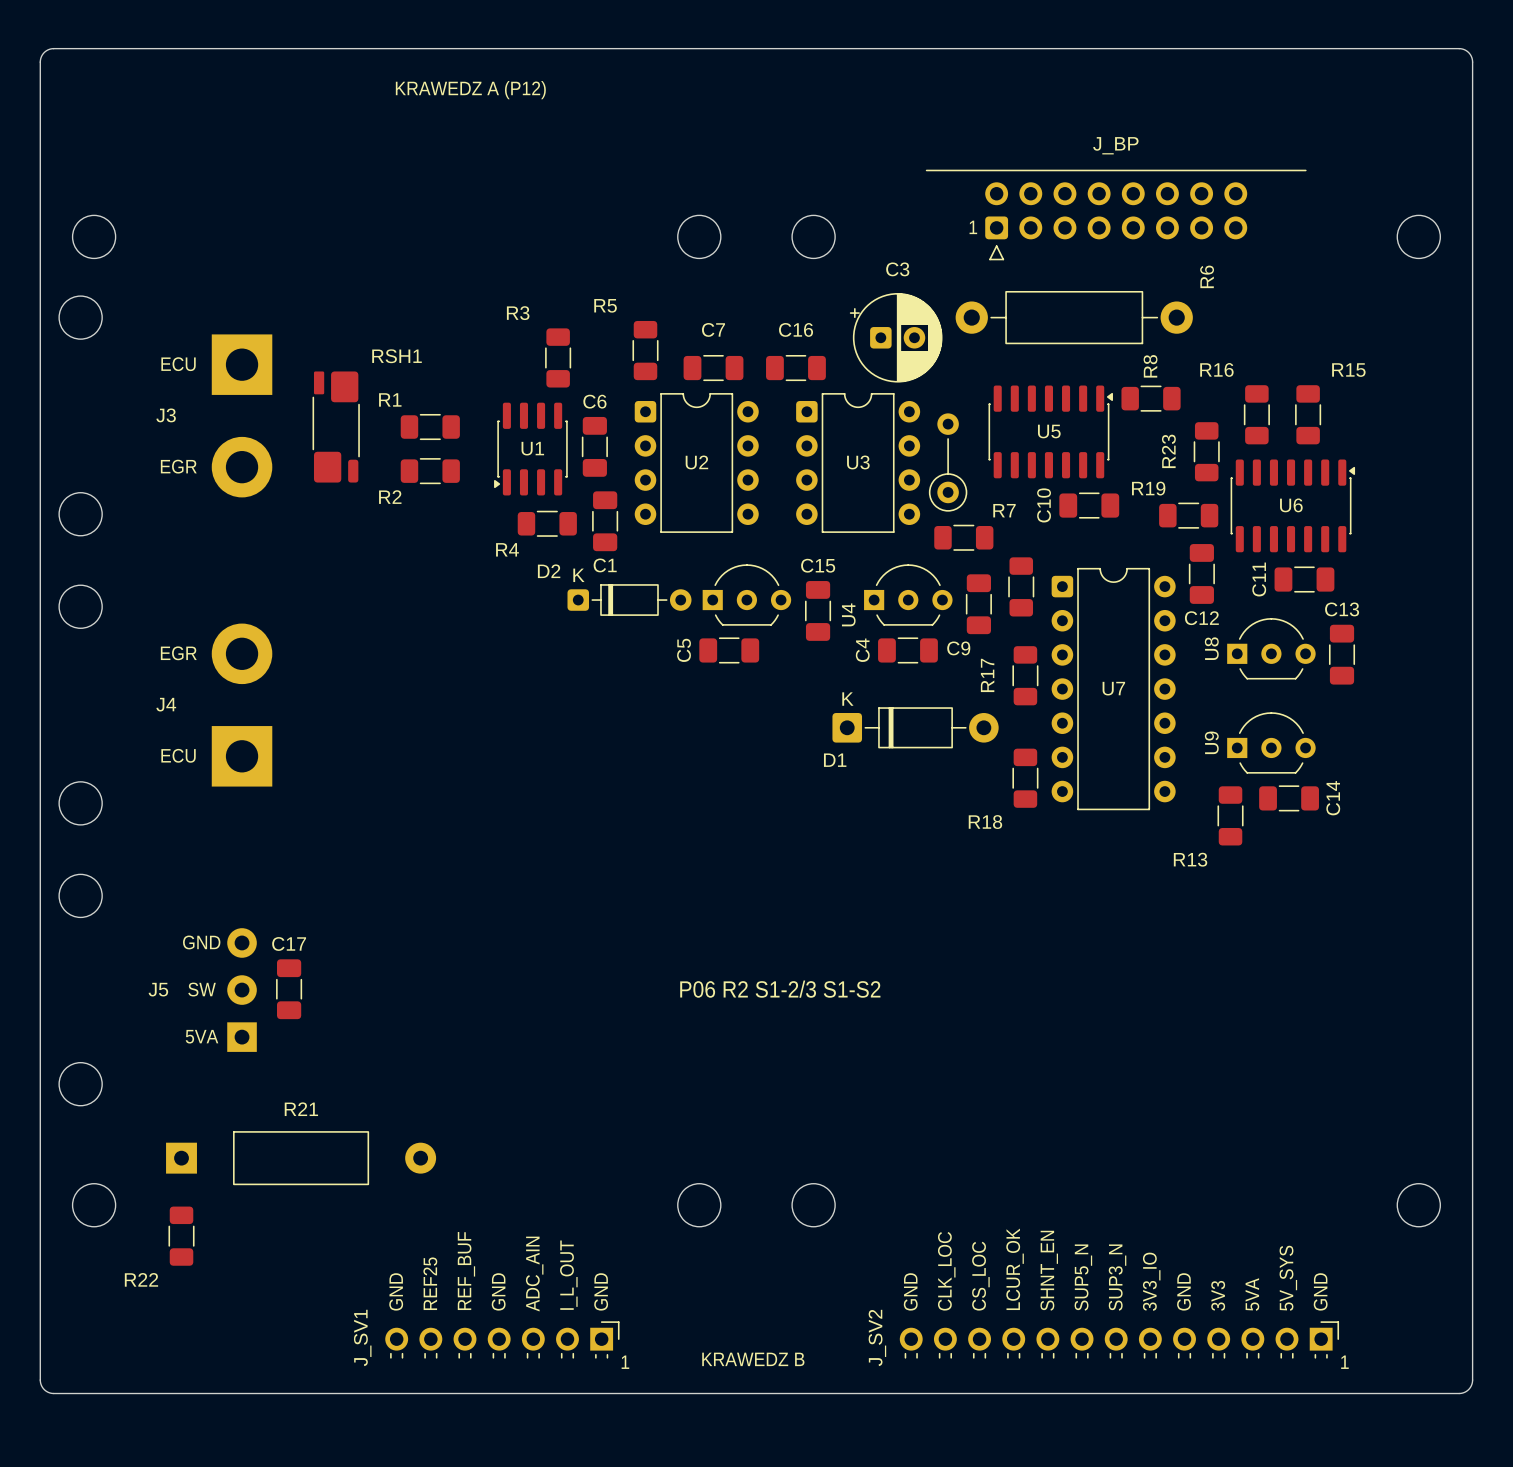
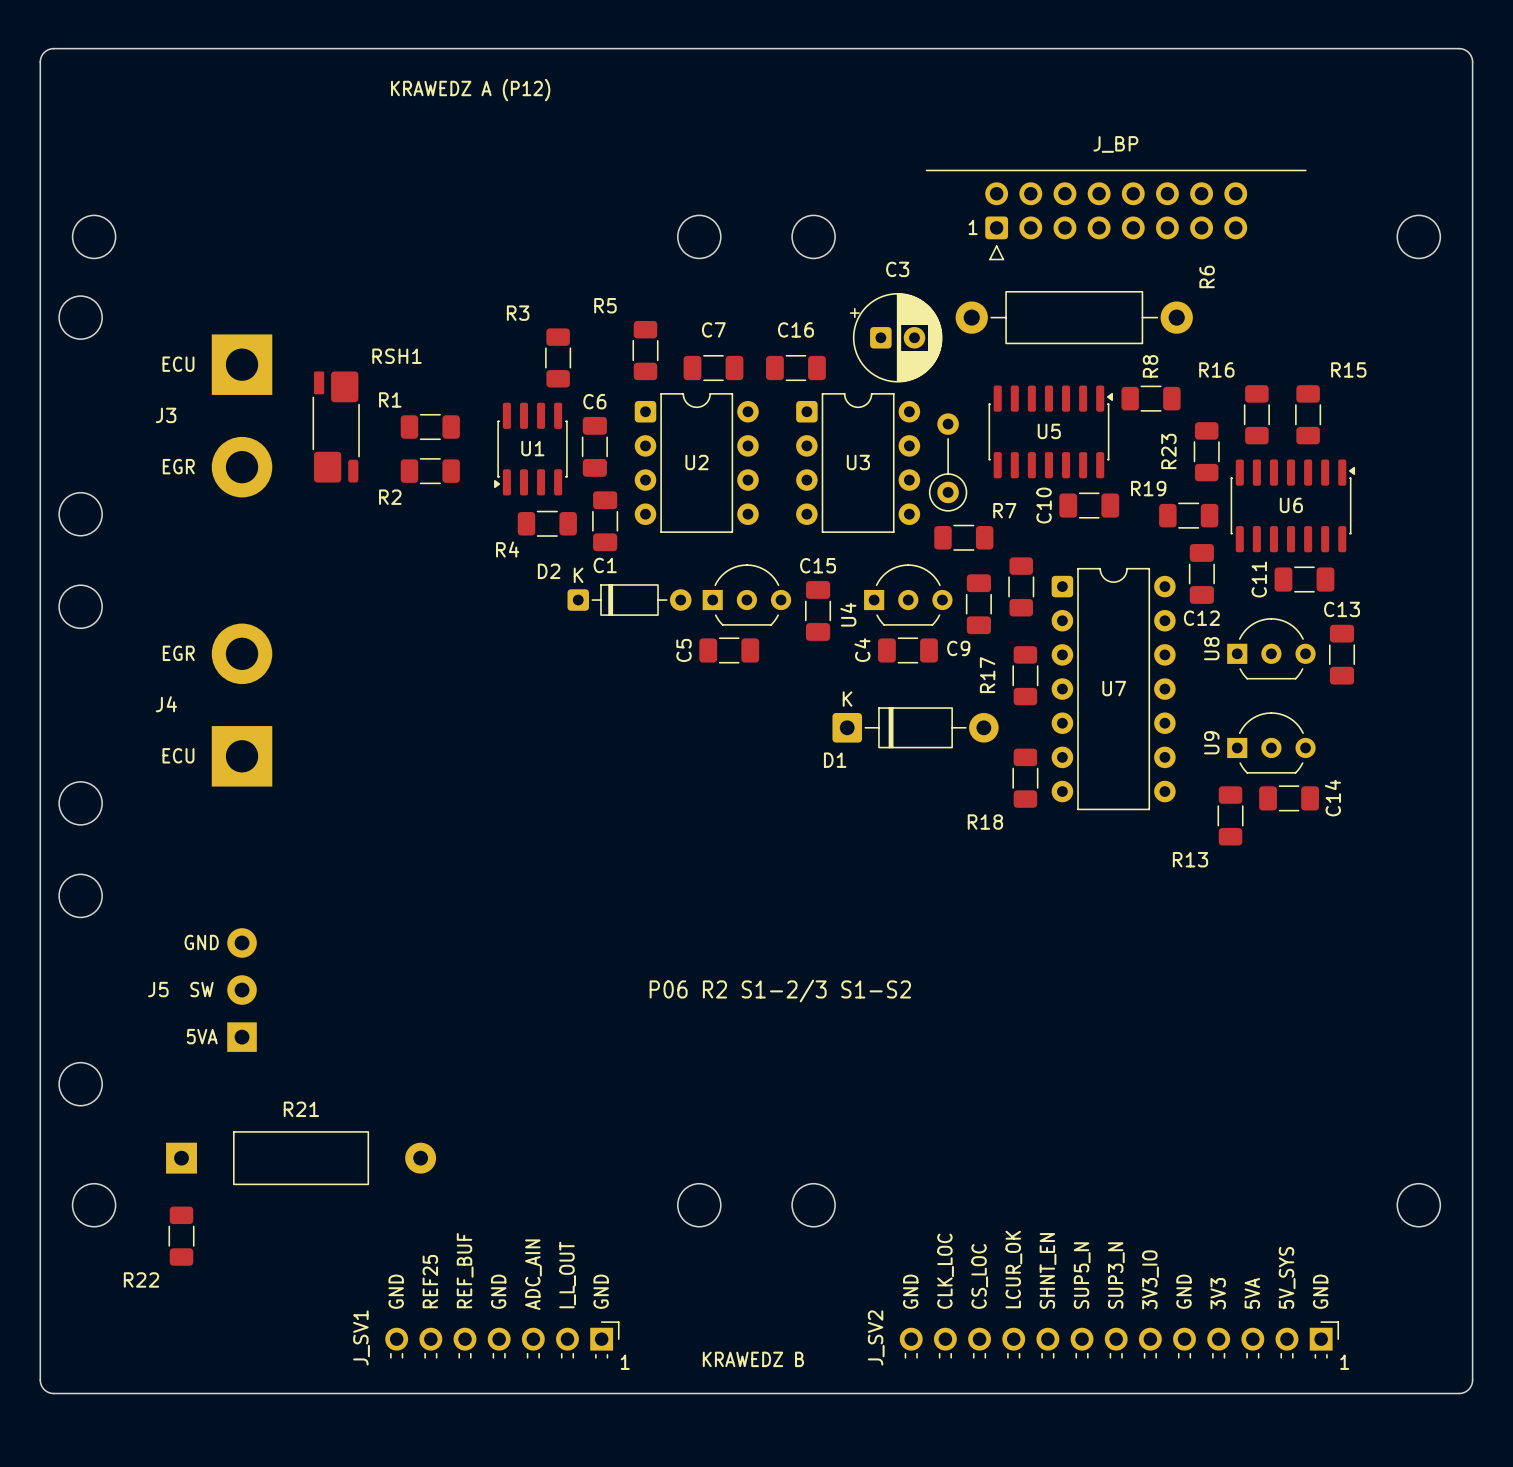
C17: (289, 989) -> none

